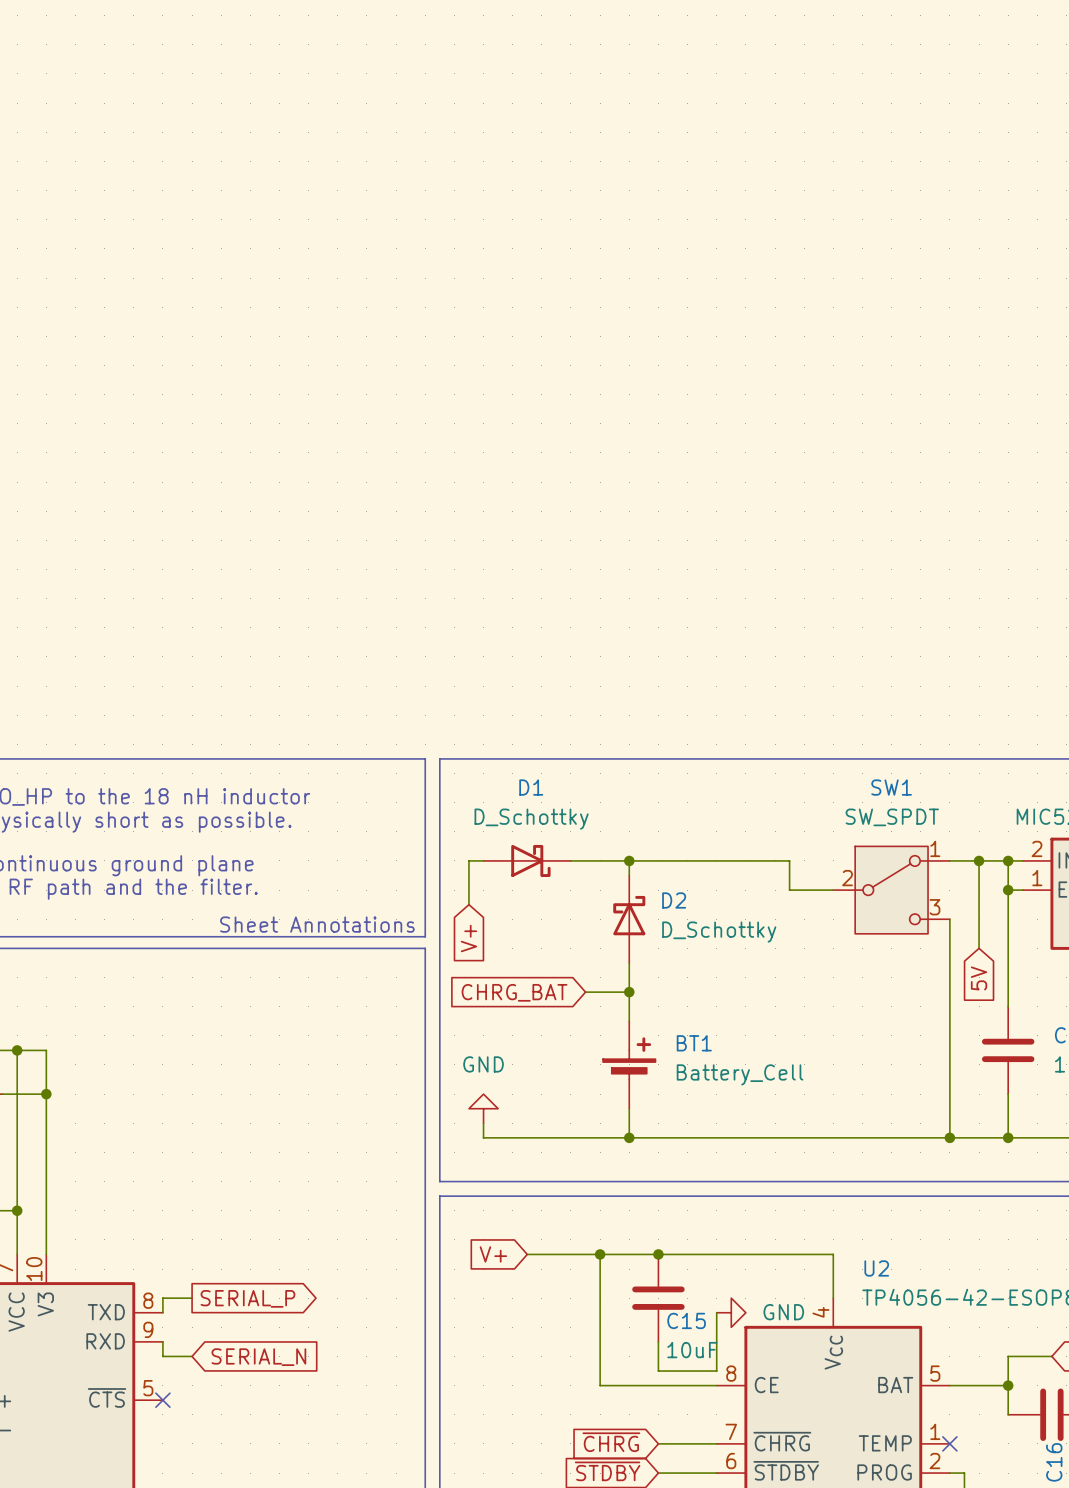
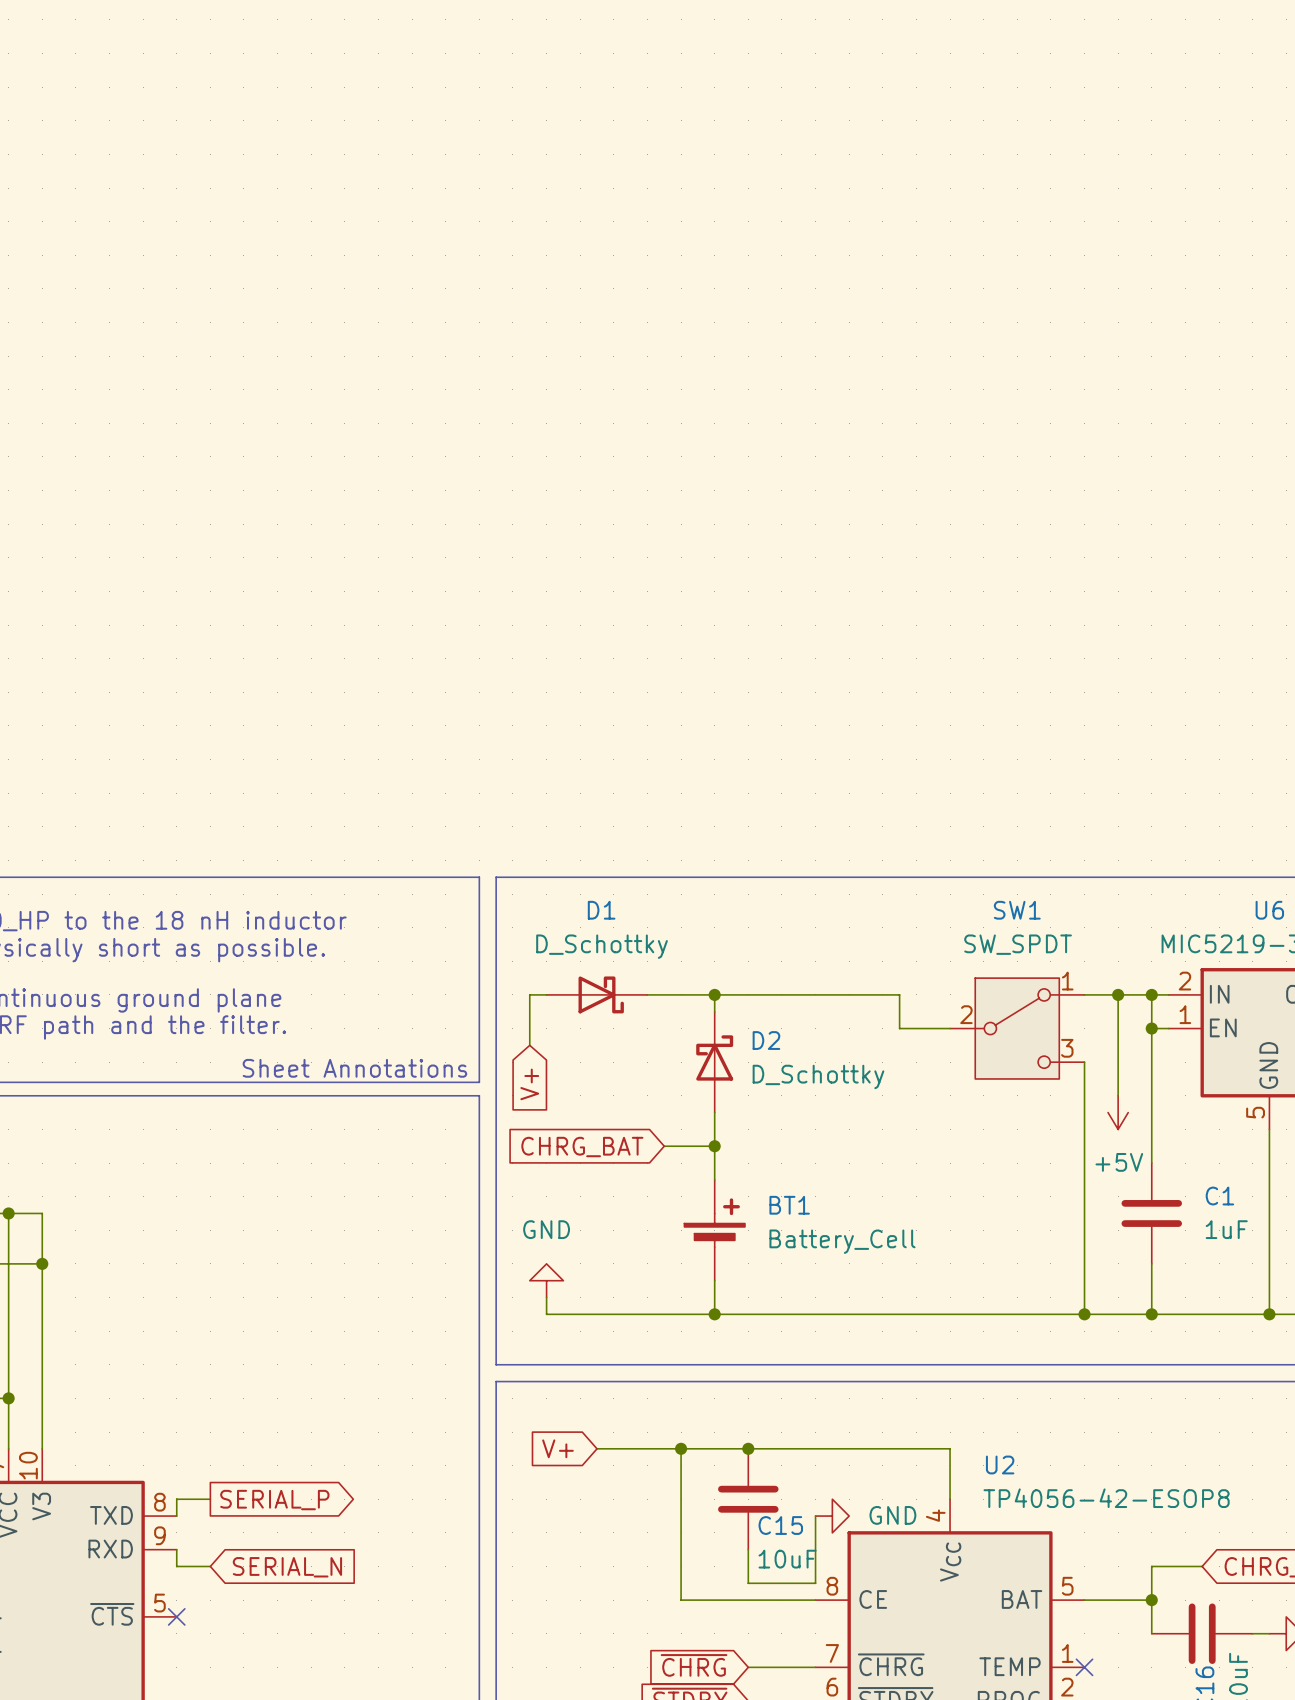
power symbol: none -> +5V (1118, 1112)
global label: 5V (979, 978) -> none

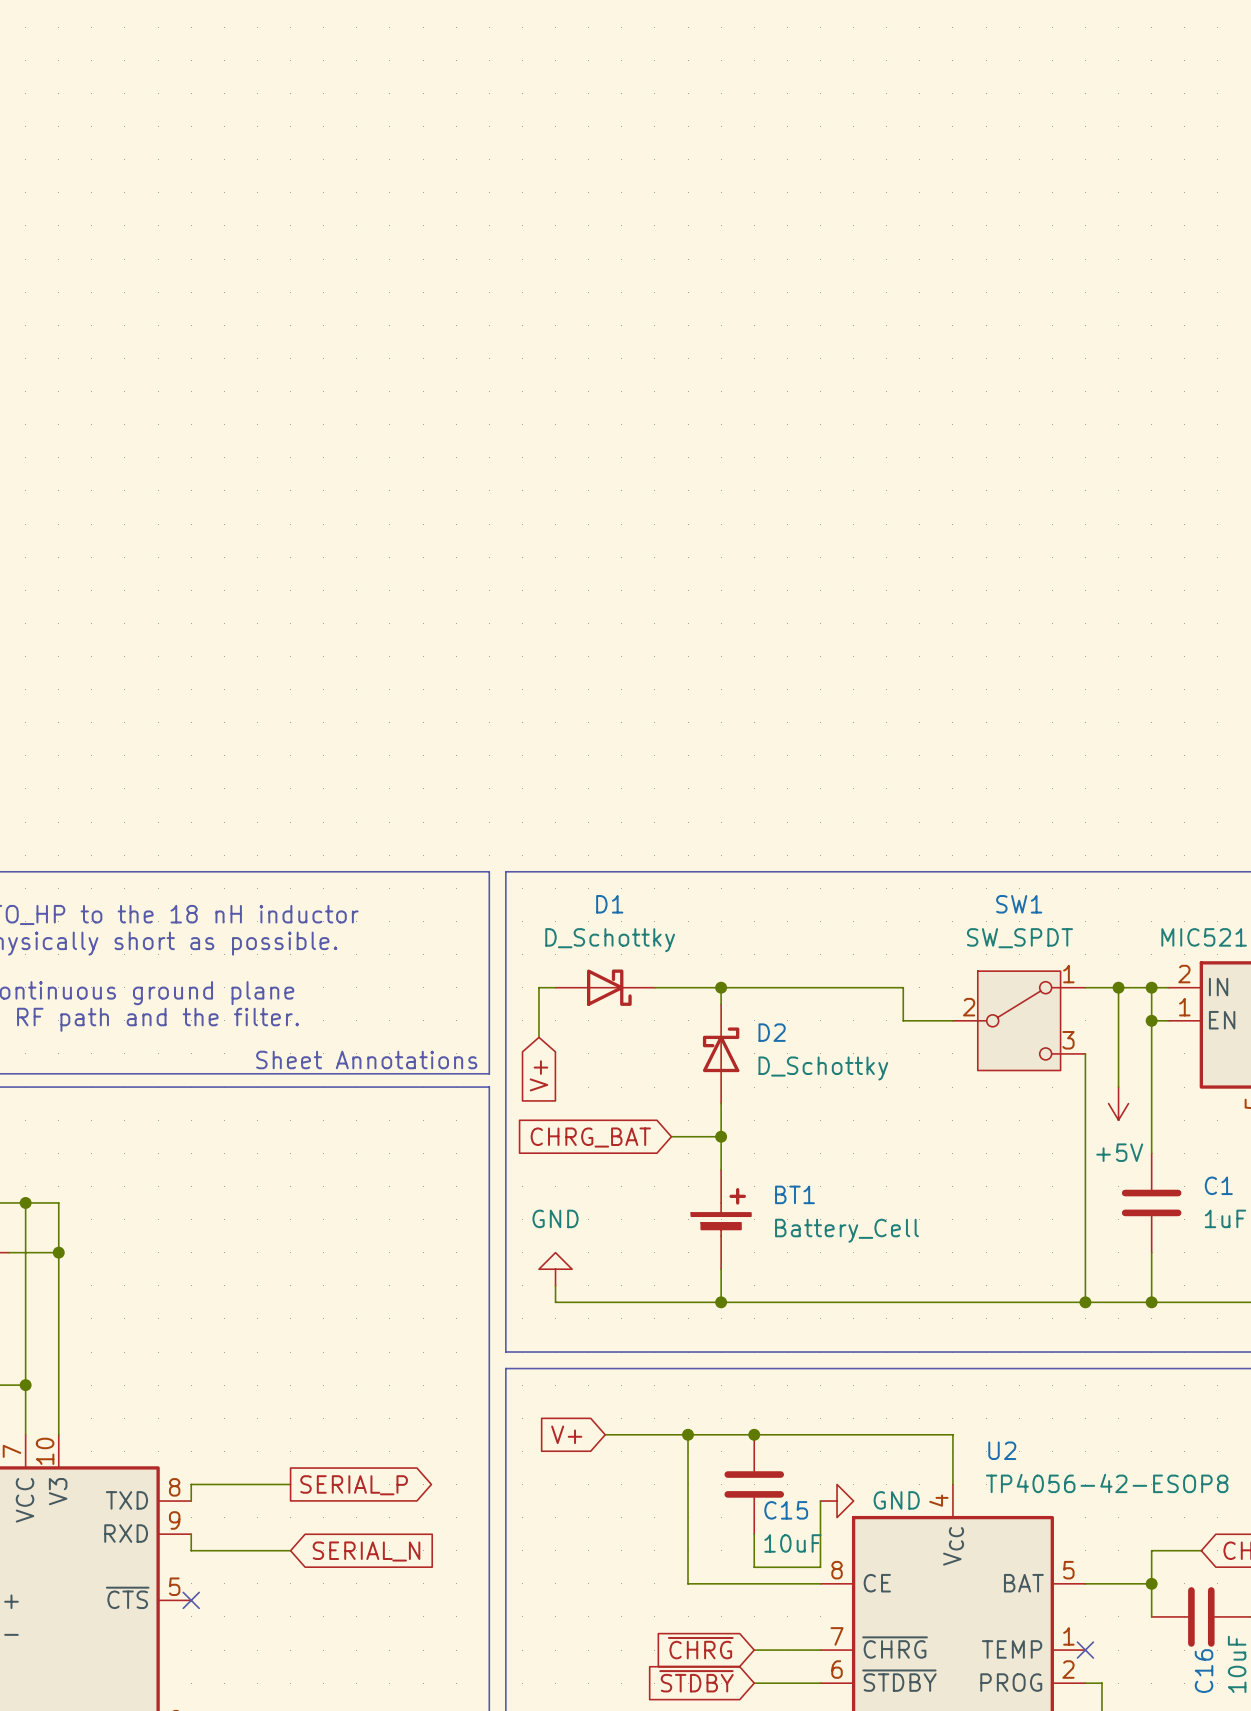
wire: none -> (224, 1484) (290, 1484)
global label position: SERIAL_P (274, 1500) -> SERIAL_P (354, 1485)
wire: none -> (224, 1550) (290, 1550)
global label position: SERIAL_N (287, 1567) -> SERIAL_N (366, 1551)

